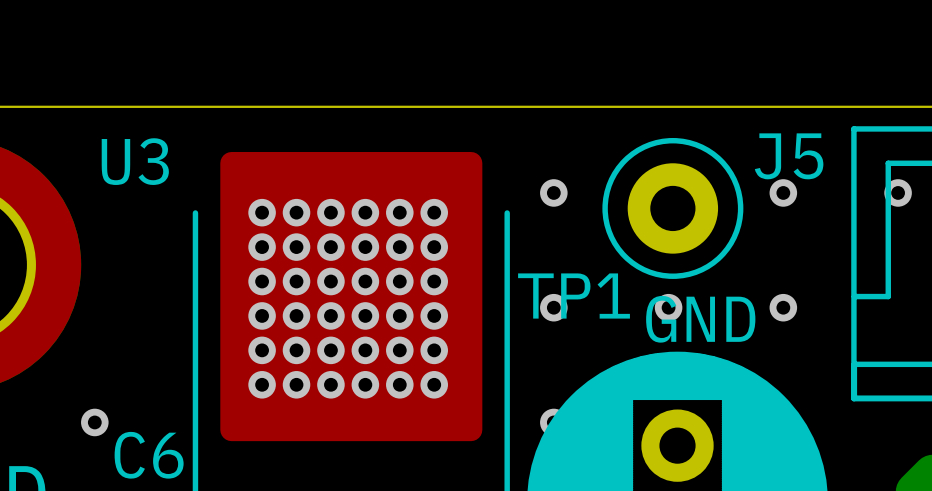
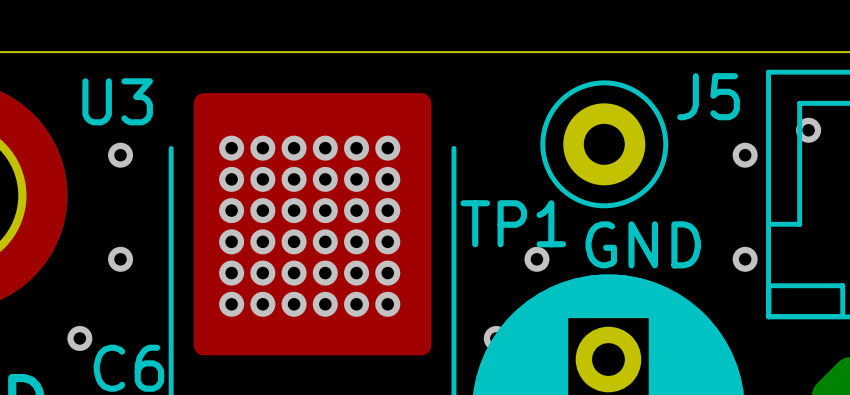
via: (553, 192) -> none
via: (783, 192) -> none
via: none -> (120, 155)
via: none -> (745, 155)
via: (553, 307) -> none
via: (668, 307) -> none
via: (783, 307) -> none
via: none -> (120, 259)
via: none -> (536, 259)
via: none -> (745, 259)

